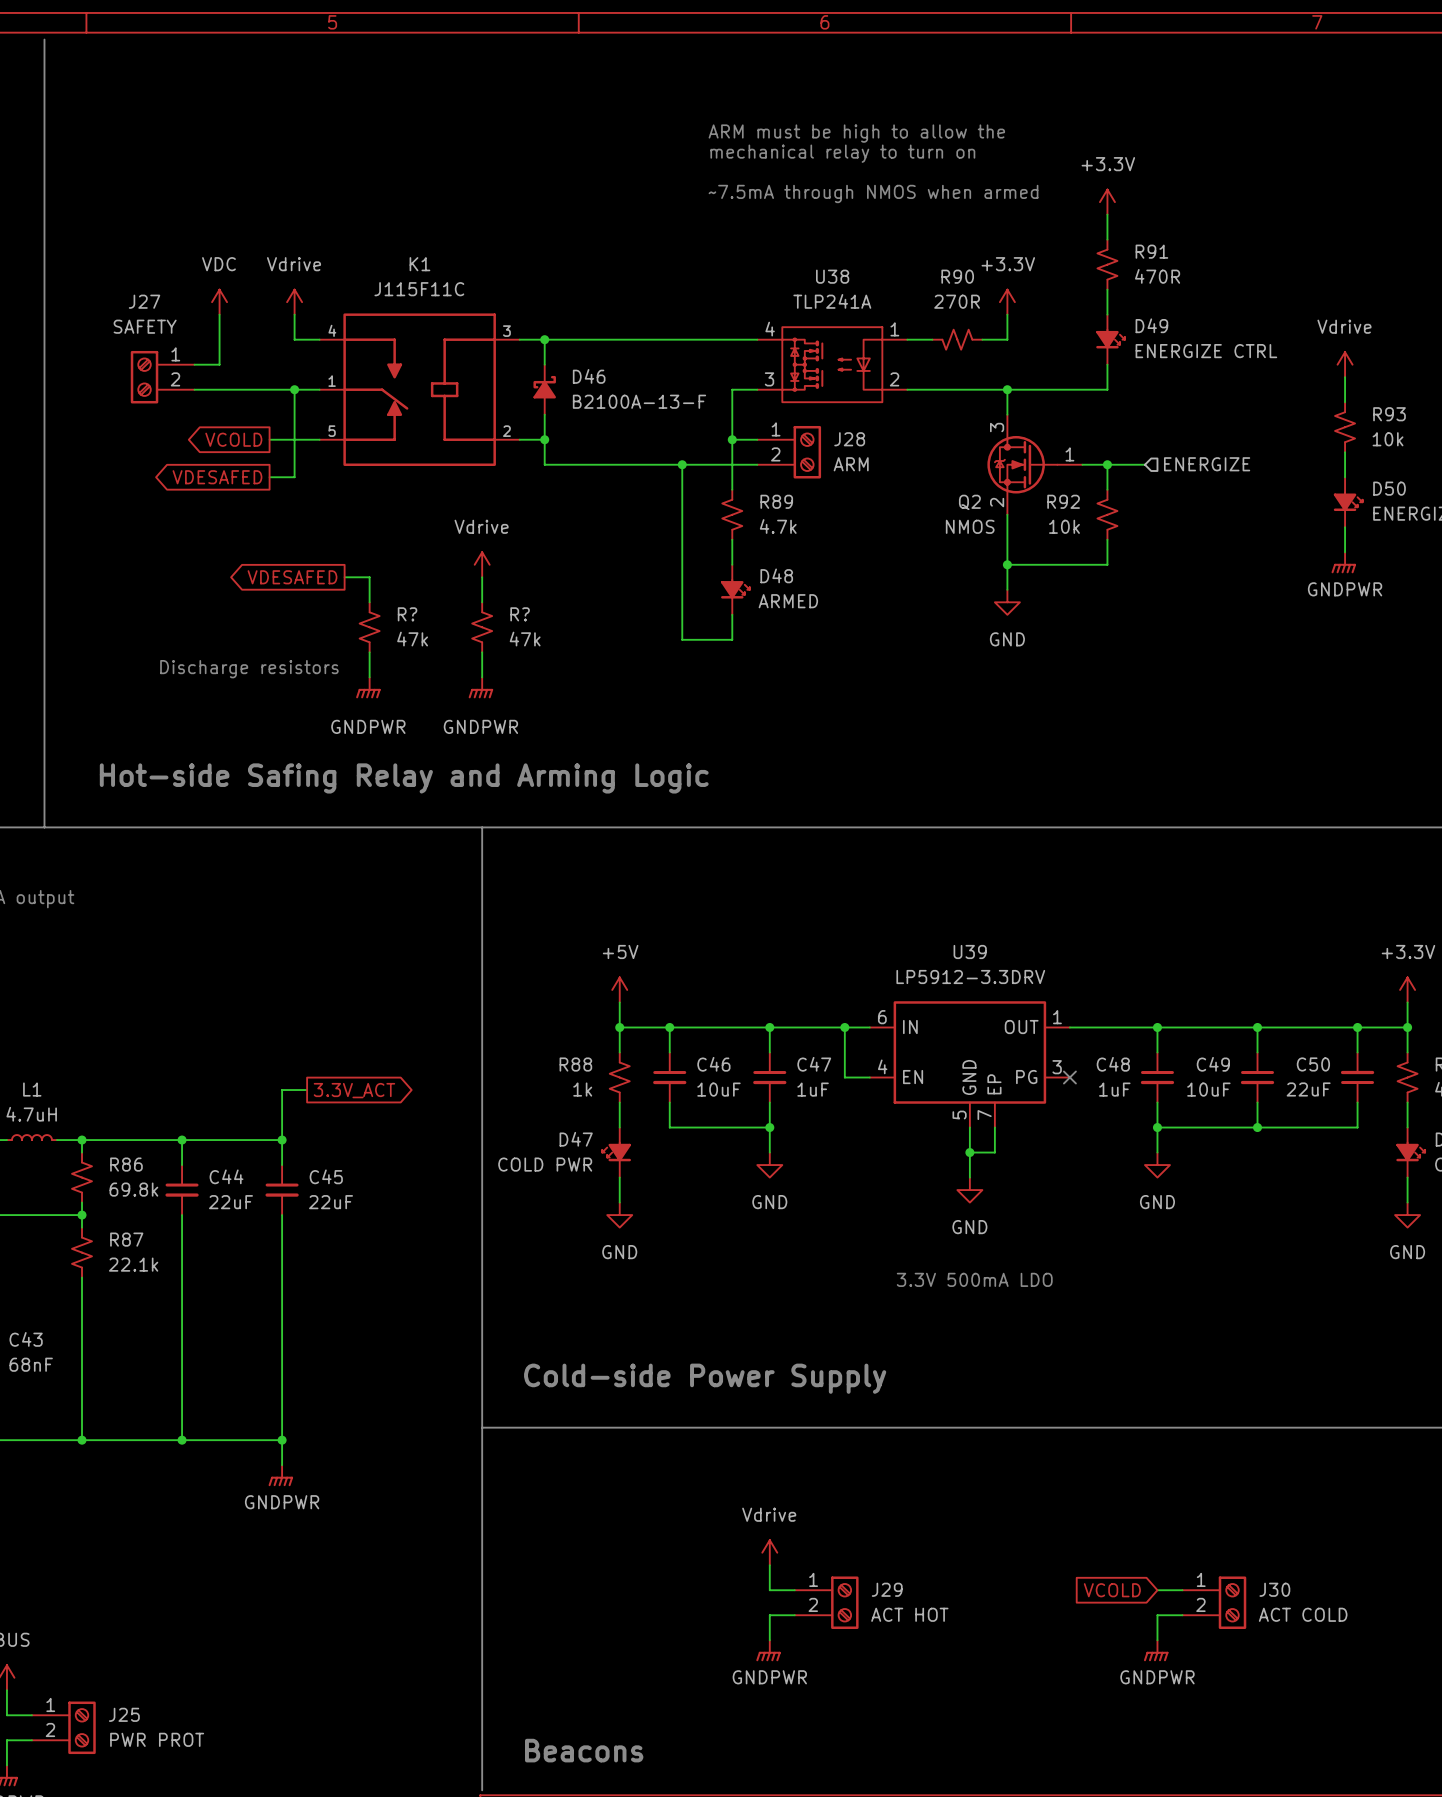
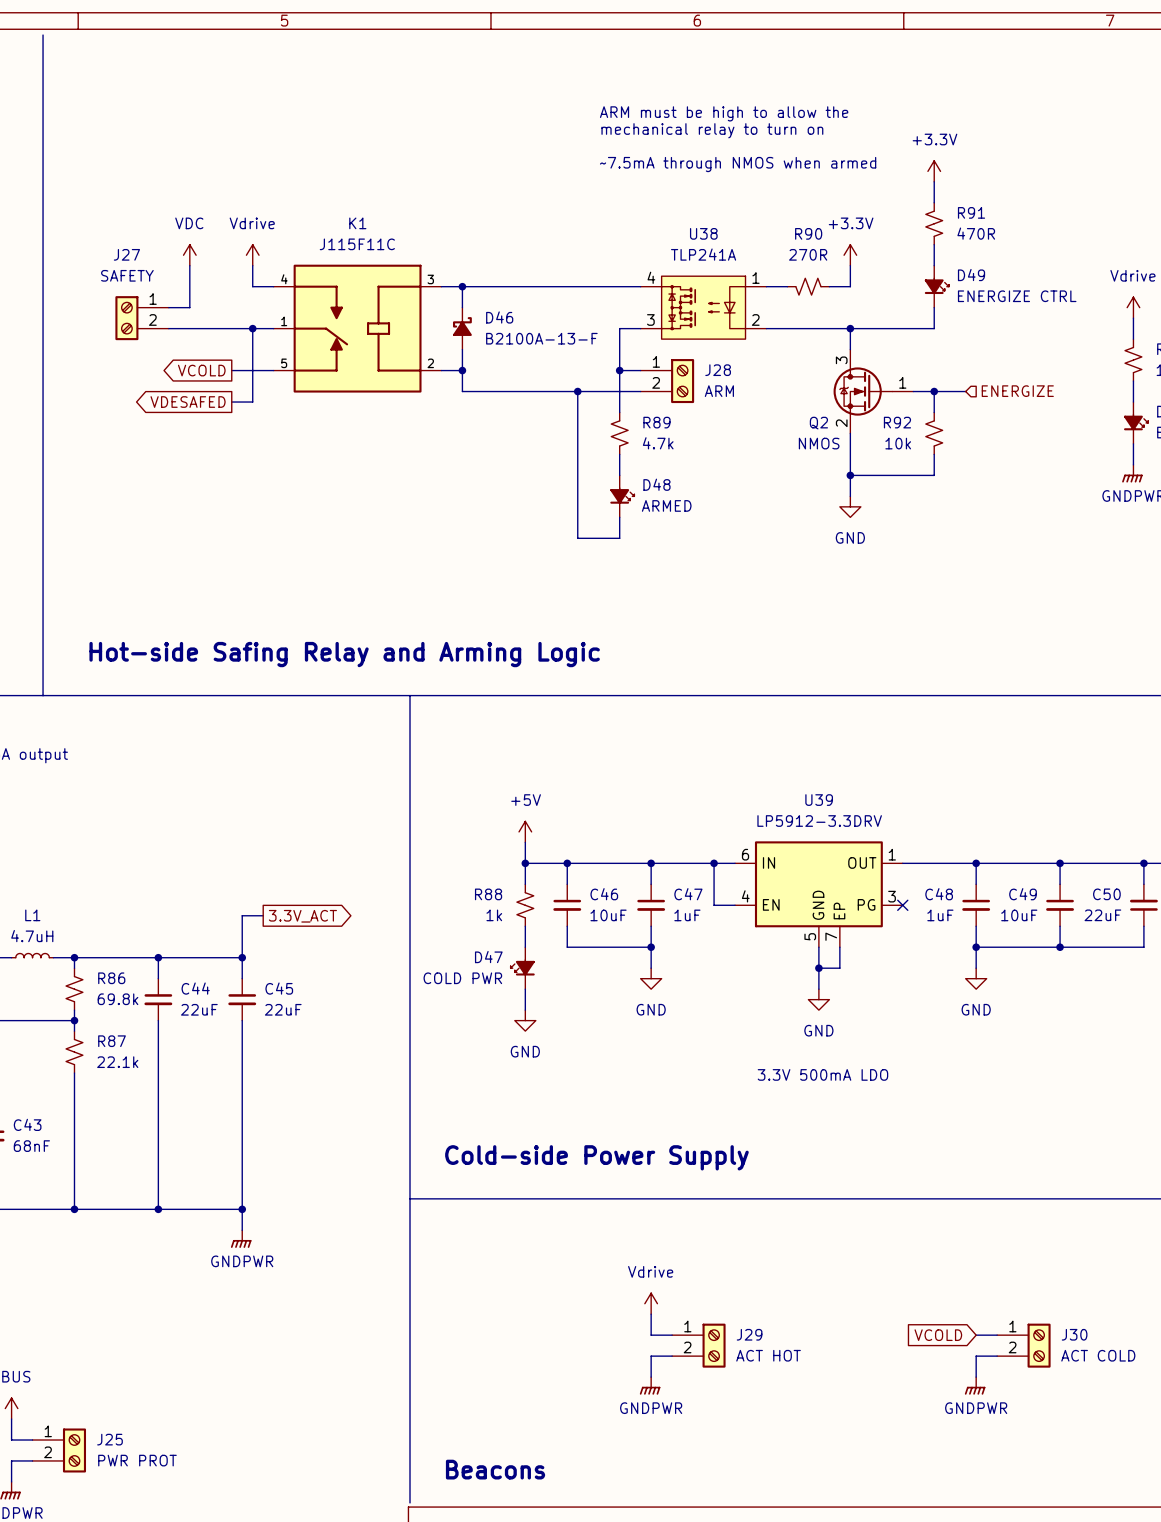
power symbol: Vdrive (482, 564) -> none
global label: VDESAFED (292, 577) -> none
wire: (344, 577) (369, 577) (369, 602) -> none
wire: (482, 577) (482, 602) -> none
R?: 47k (369, 627) -> none
R?: 47k (482, 627) -> none
wire: (369, 652) (369, 677) -> none
wire: (482, 652) (482, 677) -> none
text: Discharge resistors (249, 669) -> none
power symbol: GNDPWR (368, 687) -> none
power symbol: GNDPWR (480, 687) -> none

